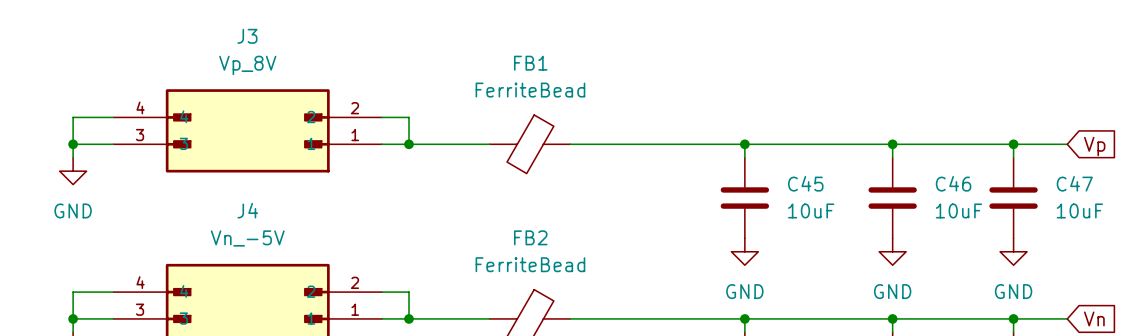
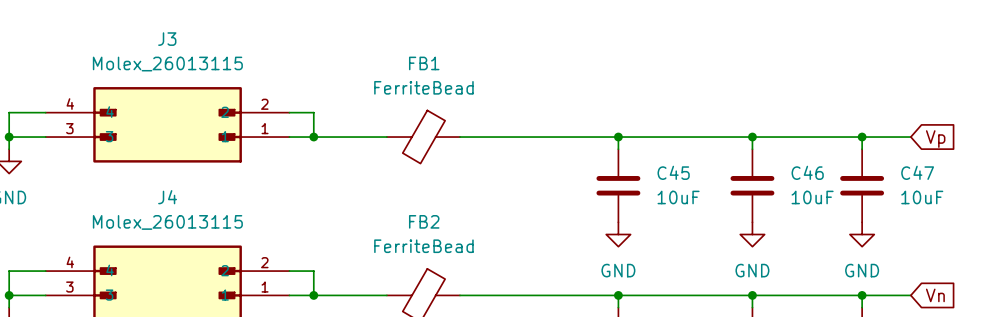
J3 value: Vp_8V (247, 65) -> Molex_26013115 (167, 64)
J4 value: Vn_-5V (247, 238) -> Molex_26013115 (167, 222)

